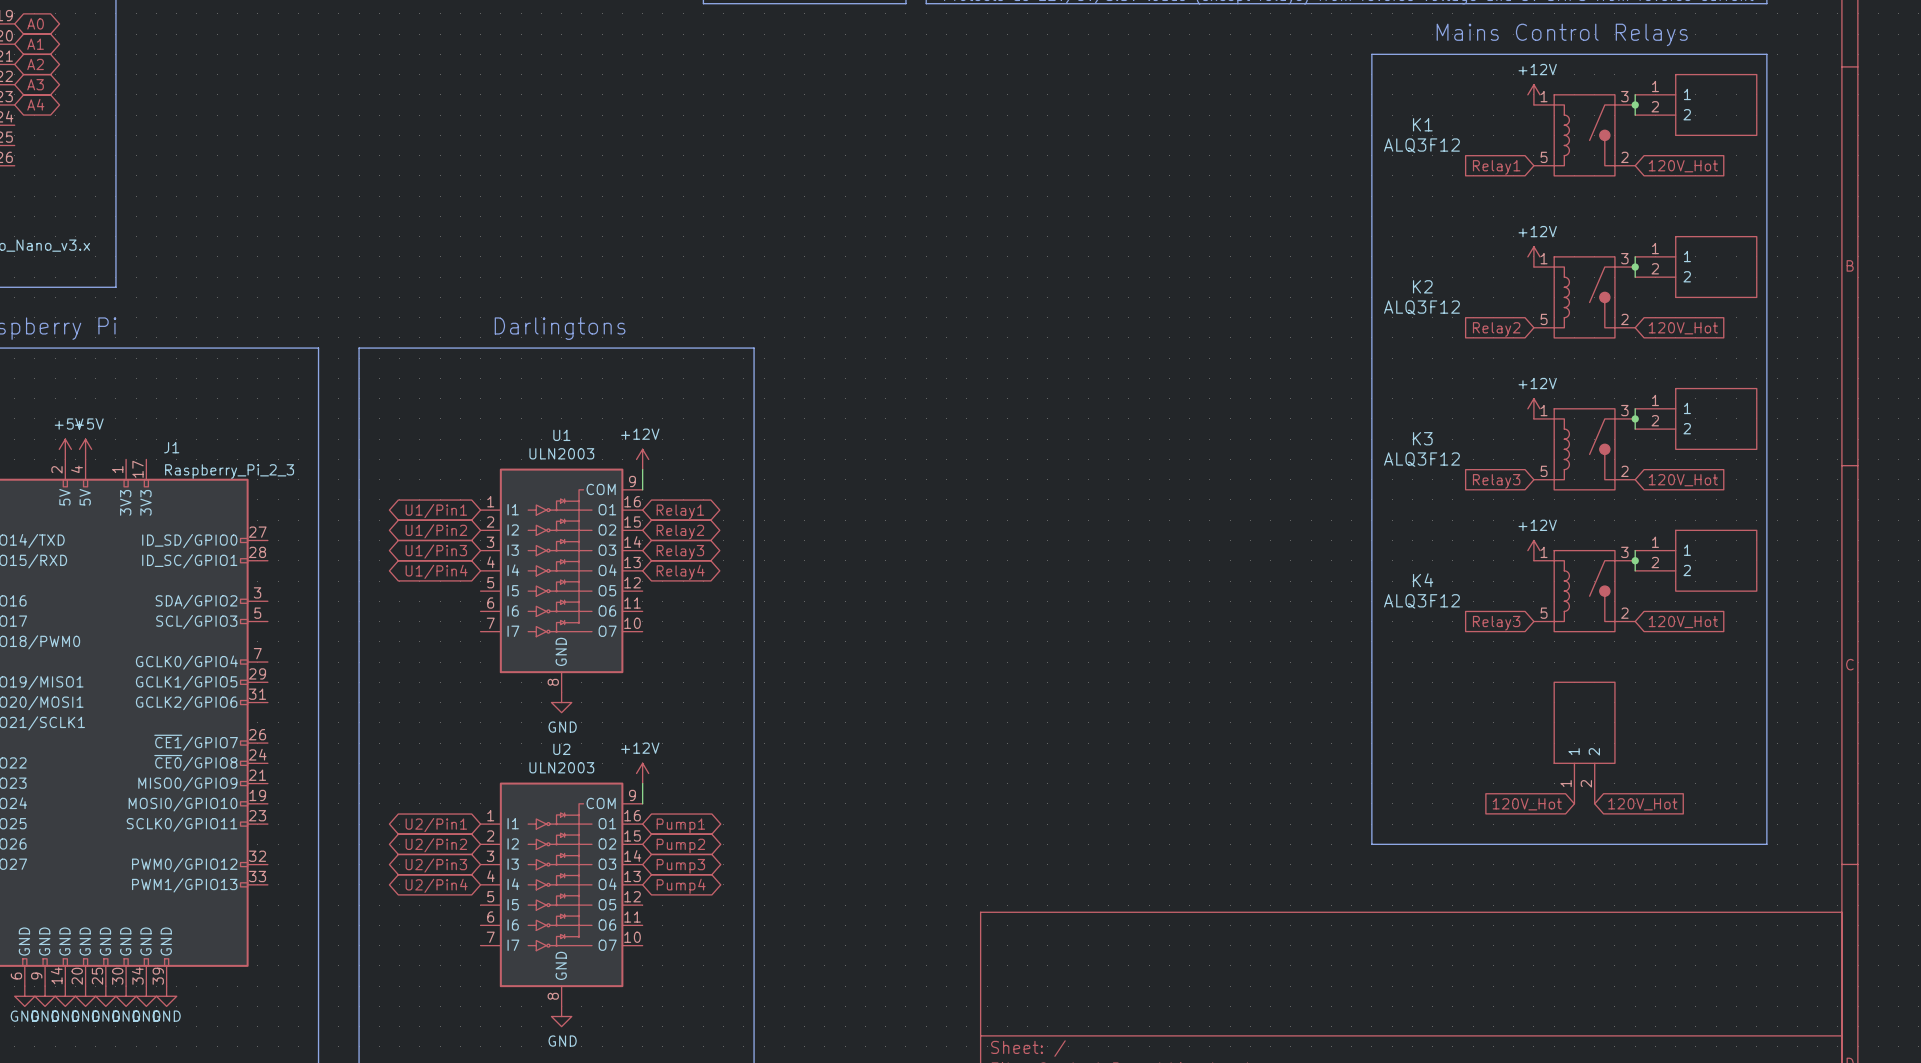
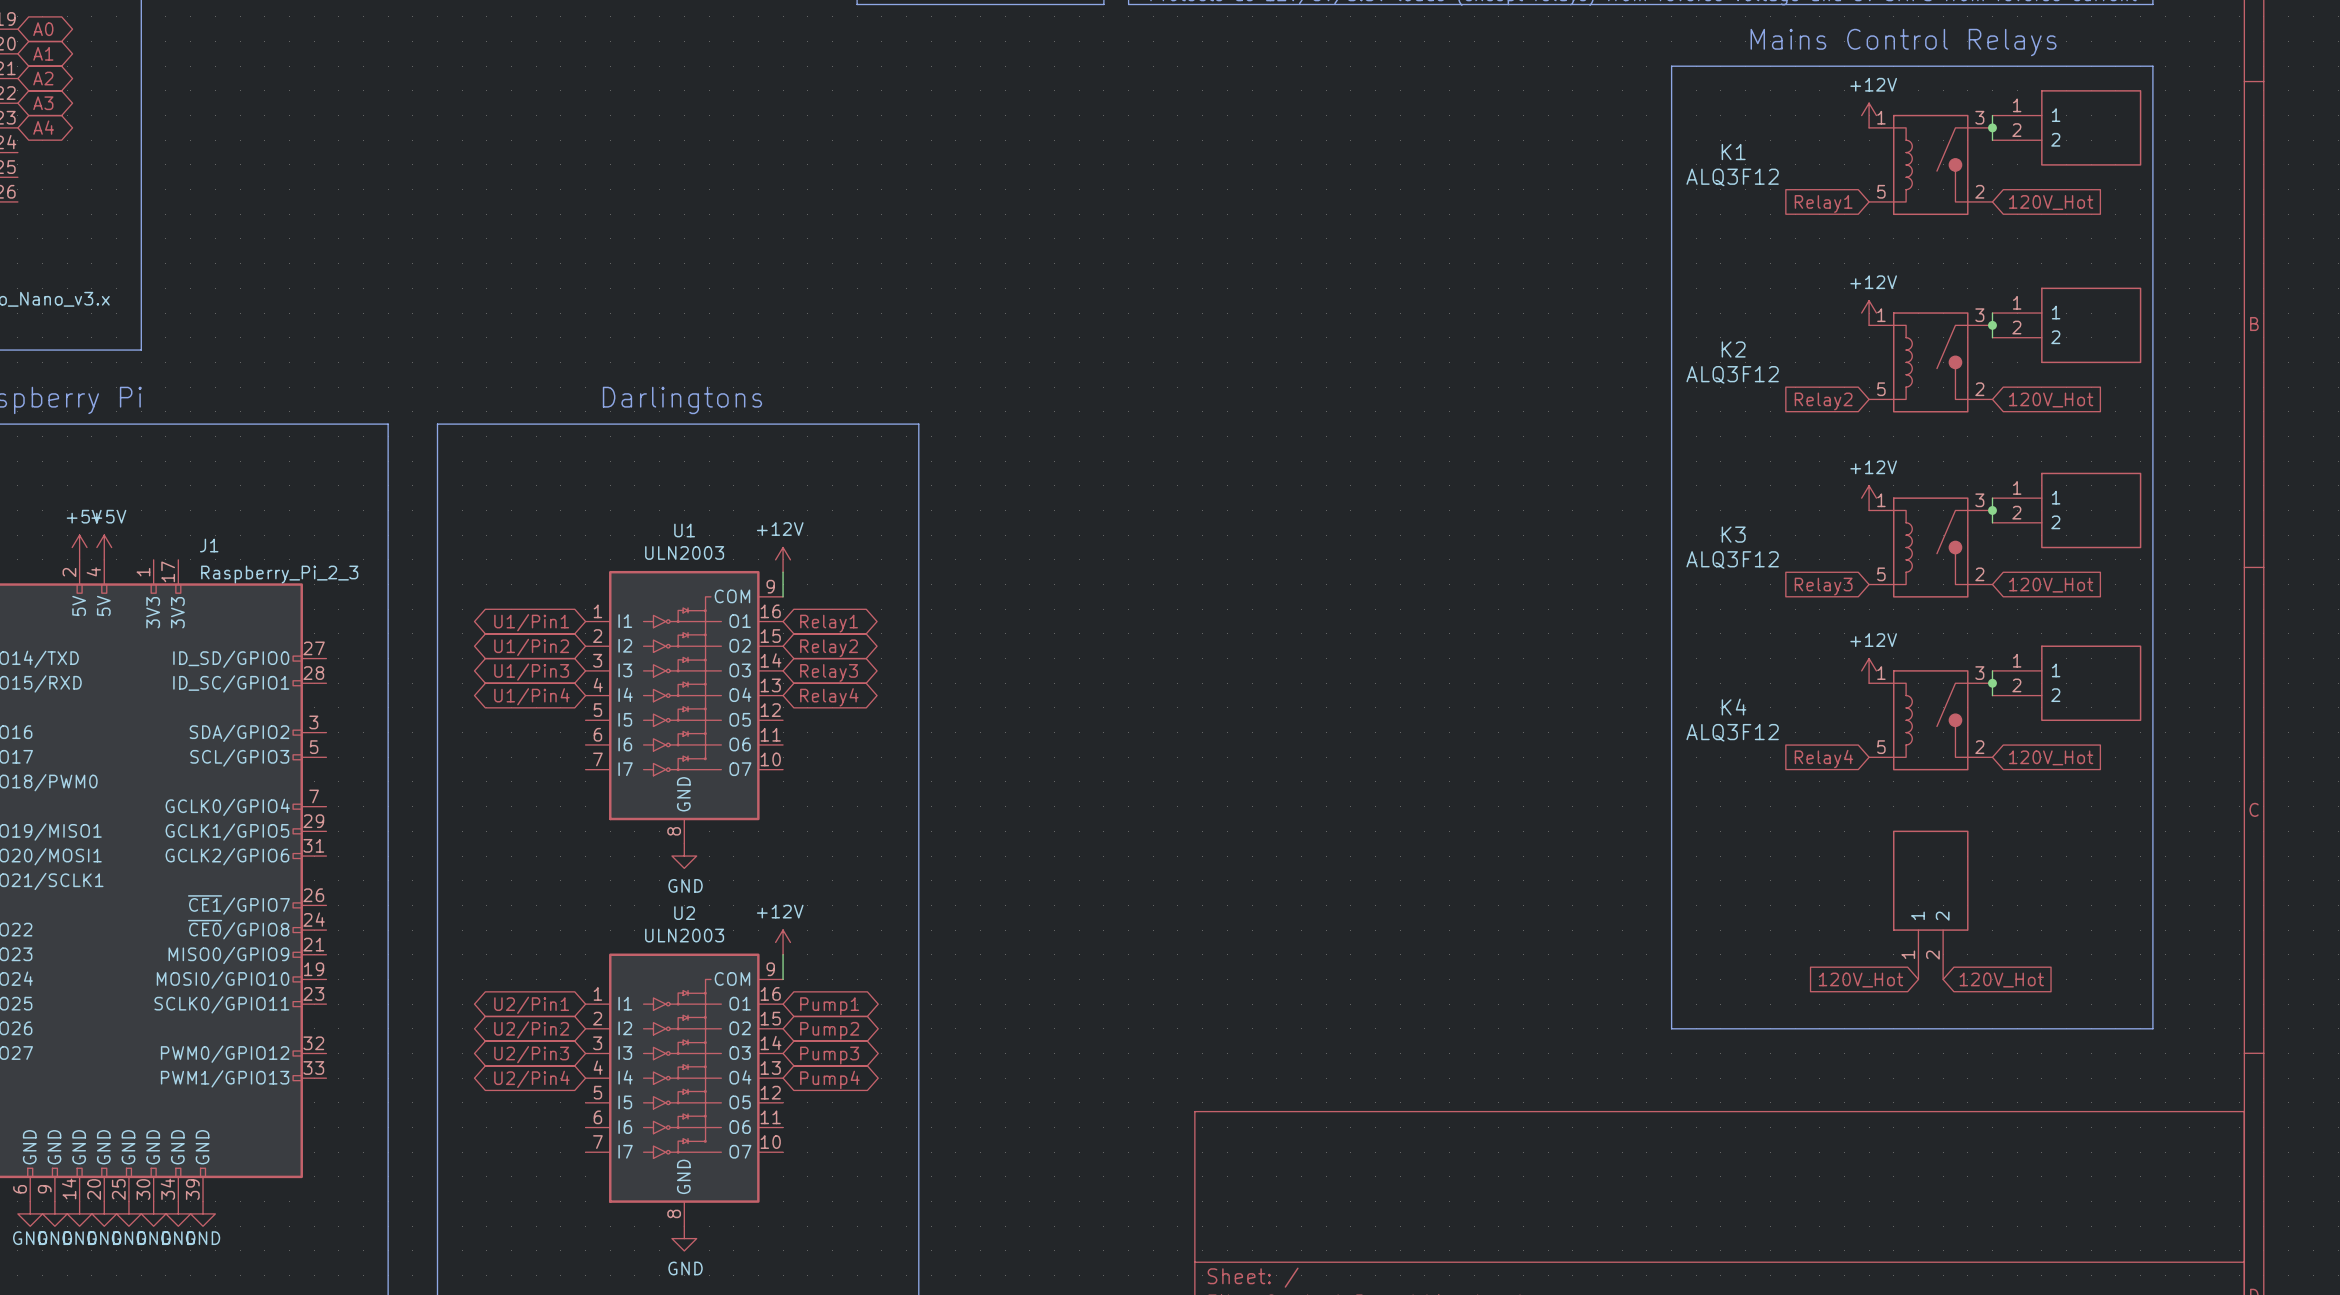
global label: Relay3 (1496, 623) -> Relay4 (1823, 759)

